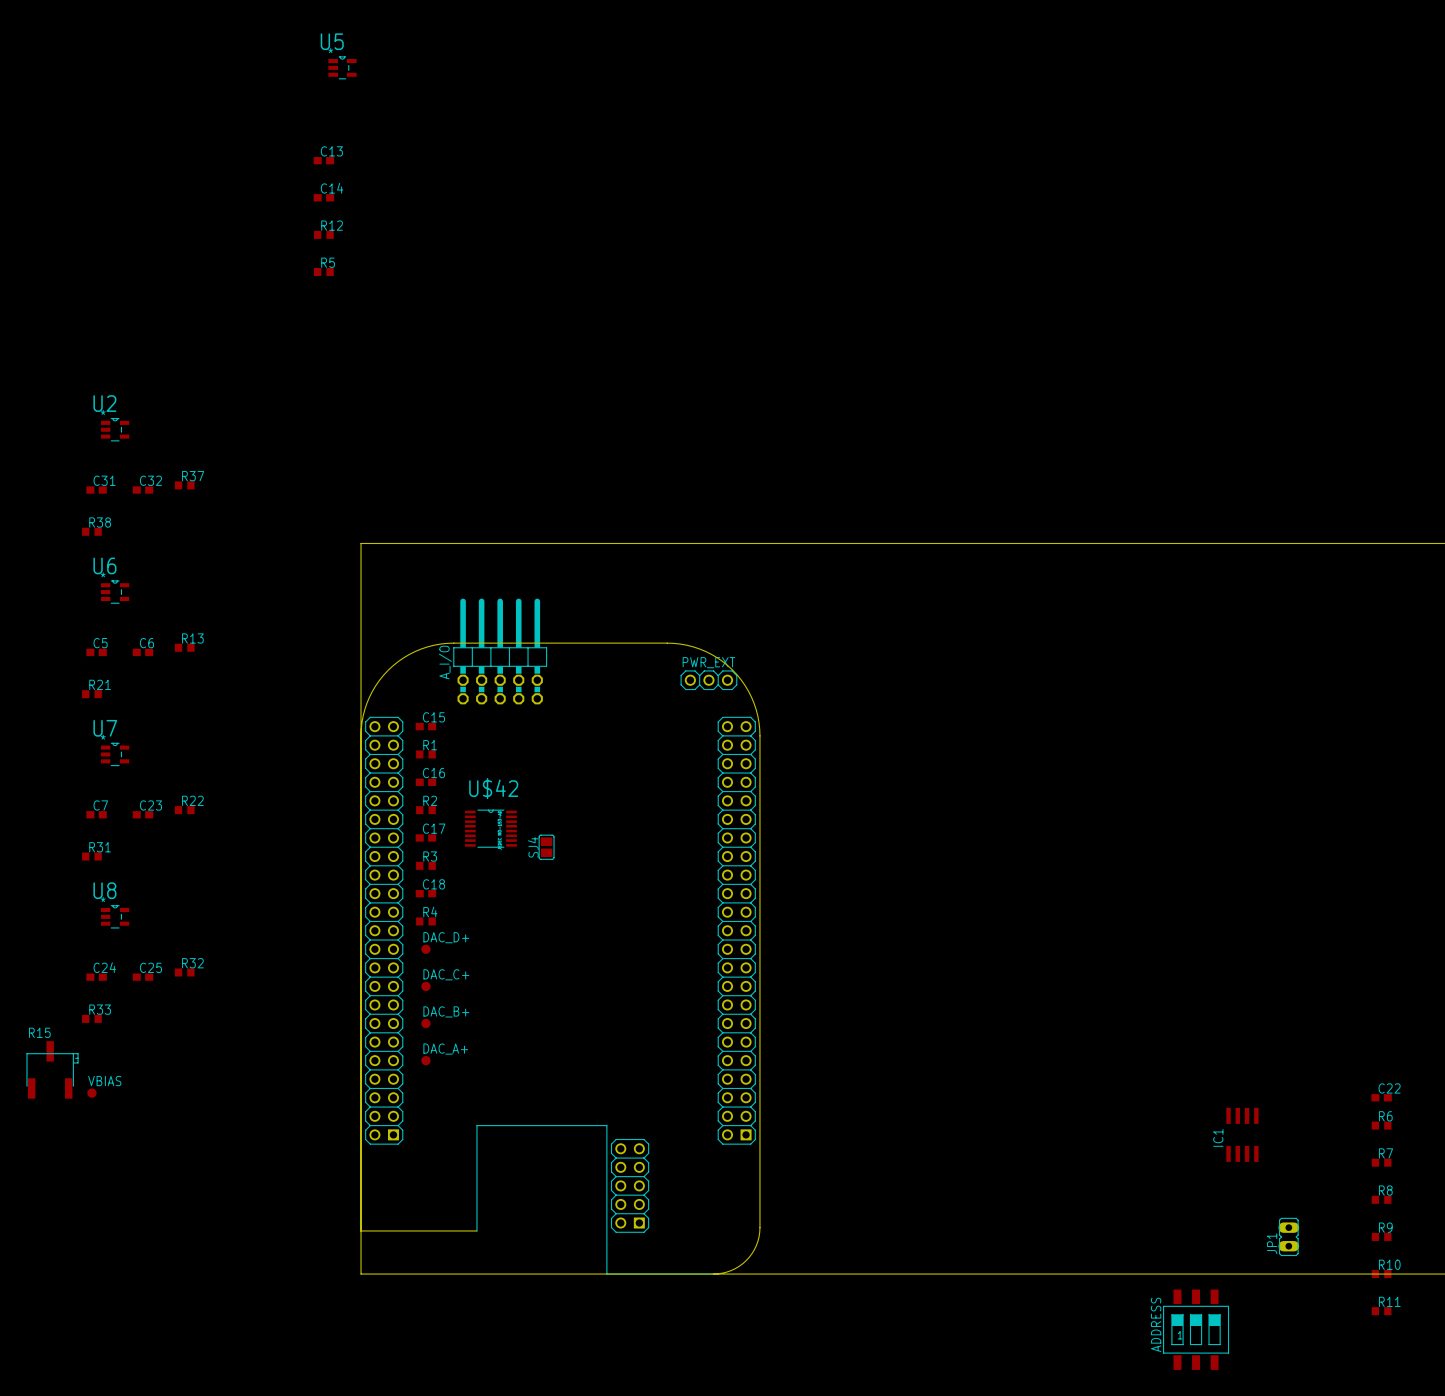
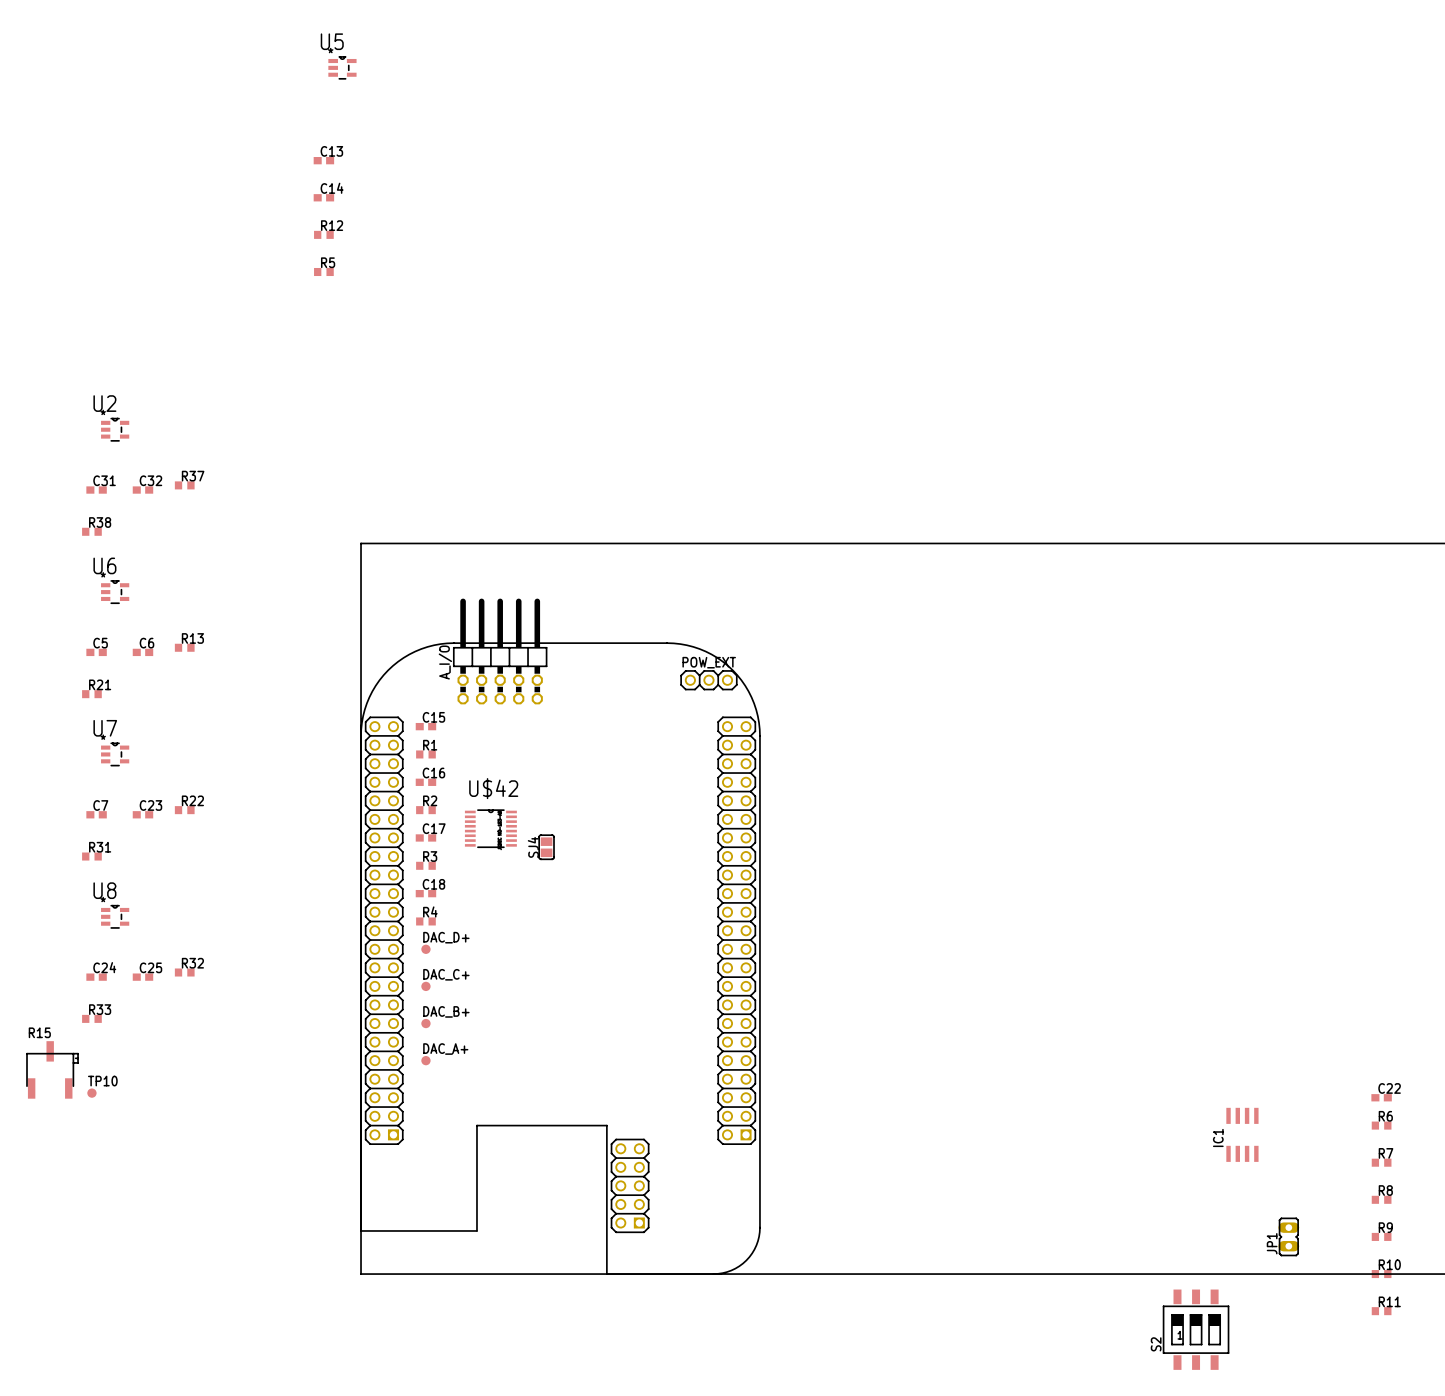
PWR_EXT name: PWR_EXT (708, 662) -> POW_EXT (709, 662)
VBIAS name: VBIAS (104, 1081) -> TP10 (102, 1081)
ADDRESS name: ADDRESS (1156, 1324) -> S2 (1156, 1344)

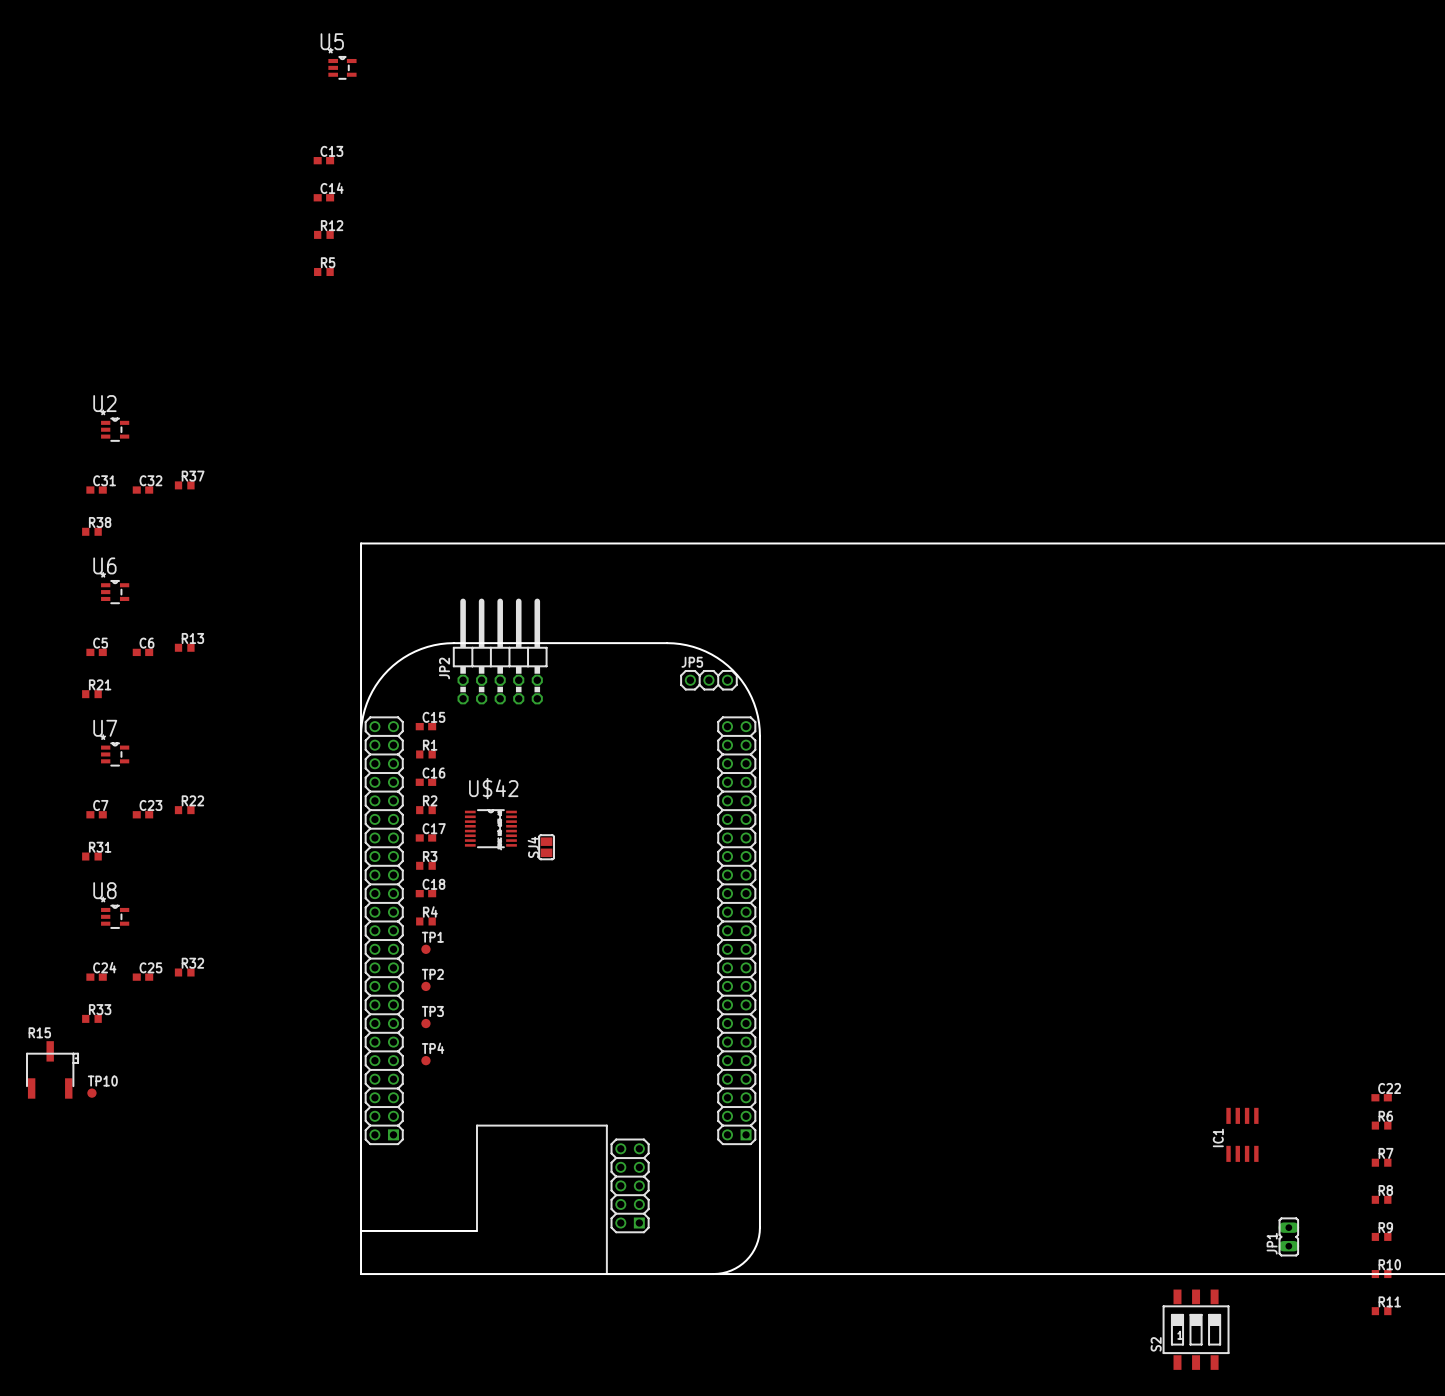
A_I/O name: A_I/O (445, 662) -> JP2 (444, 668)
POW_EXT name: POW_EXT (709, 662) -> JP5 (692, 662)
DAC_D+ name: DAC_D+ (446, 937) -> TP1 (432, 937)
DAC_C+ name: DAC_C+ (446, 974) -> TP2 (432, 974)
DAC_B+ name: DAC_B+ (446, 1011) -> TP3 (432, 1011)
DAC_A+ name: DAC_A+ (445, 1049) -> TP4 (433, 1048)

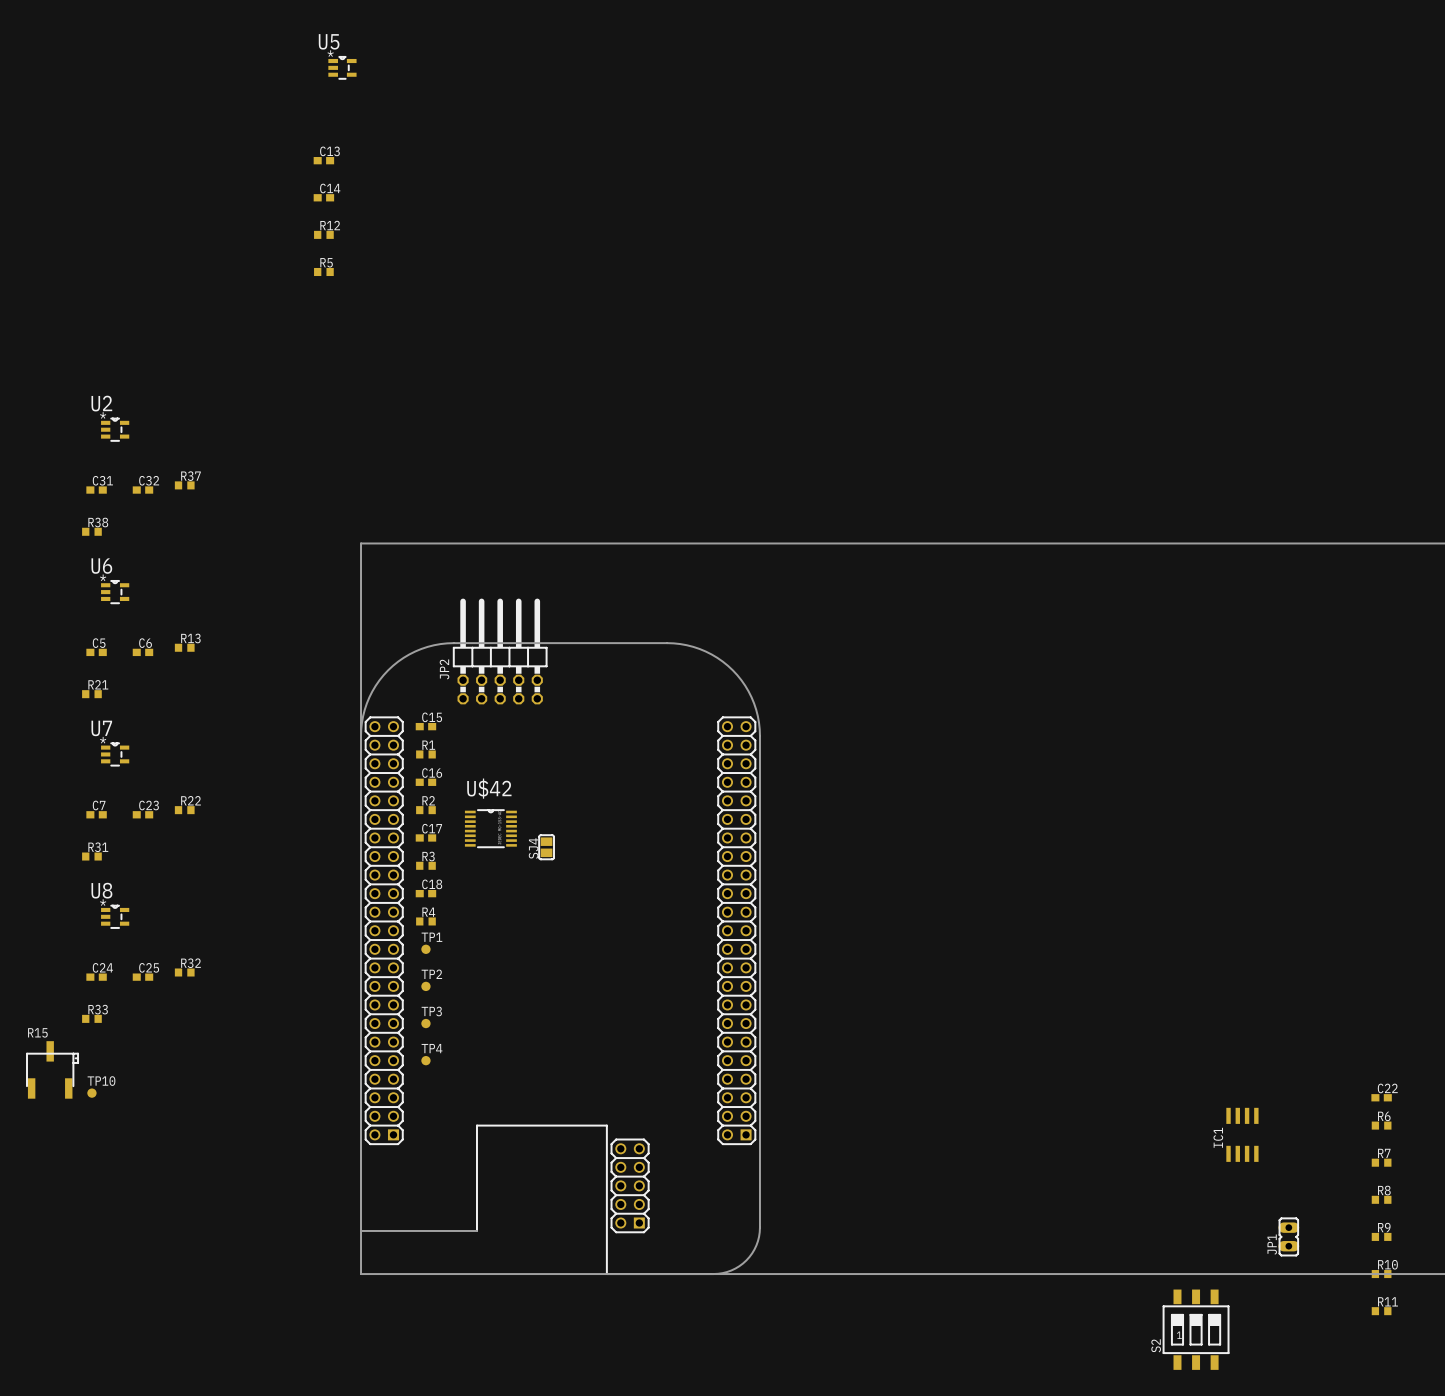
JP5: (708, 680) -> none

